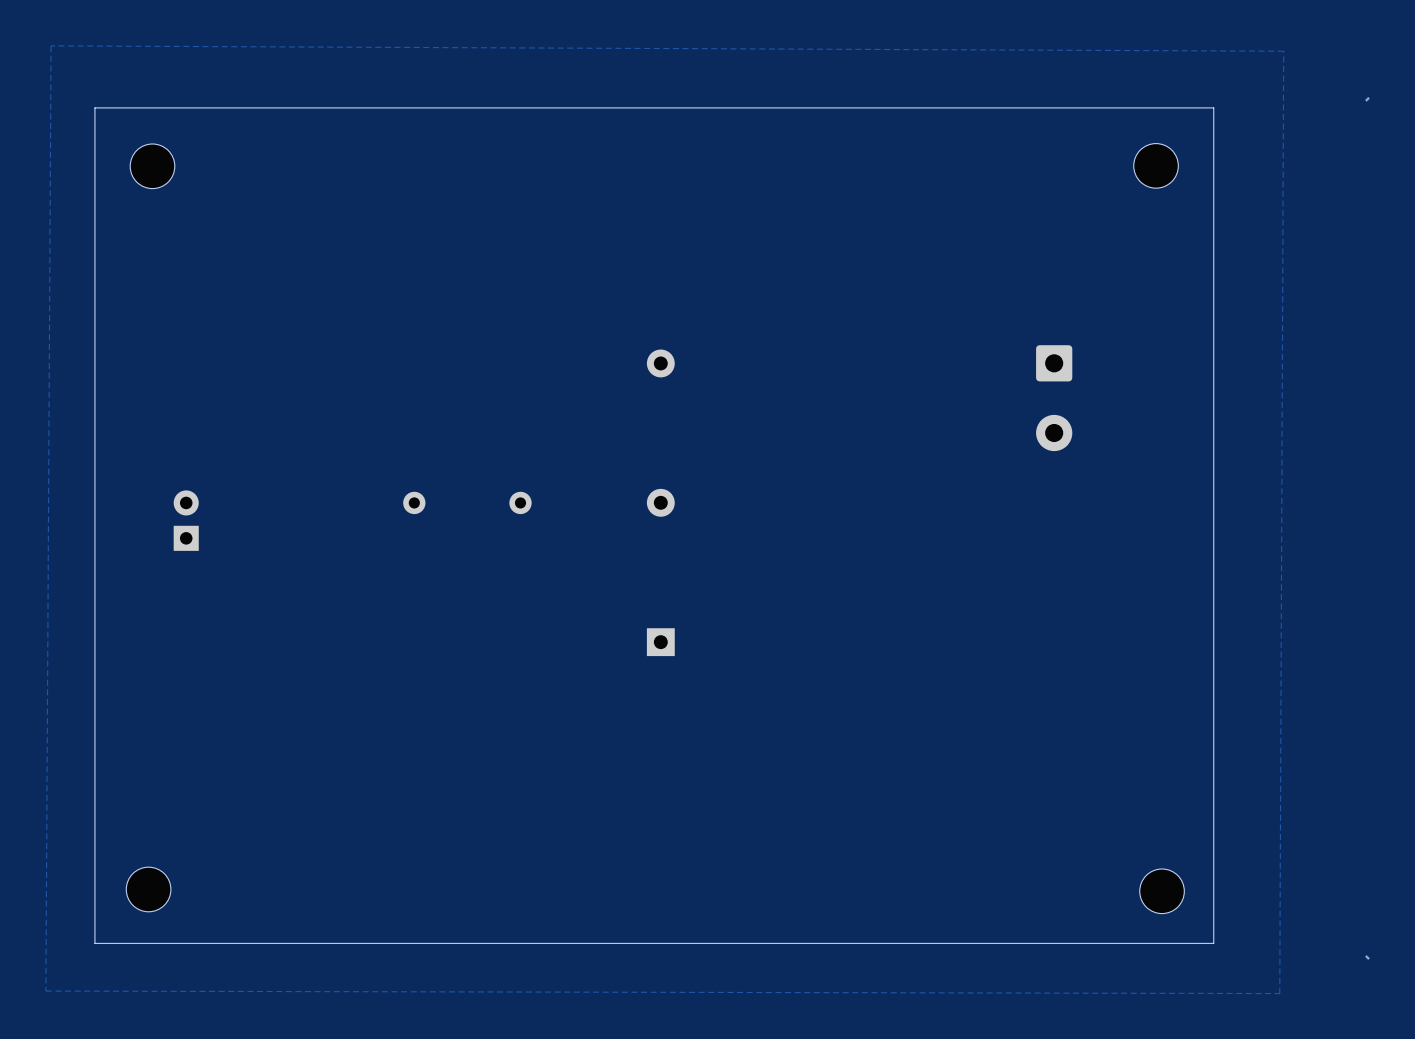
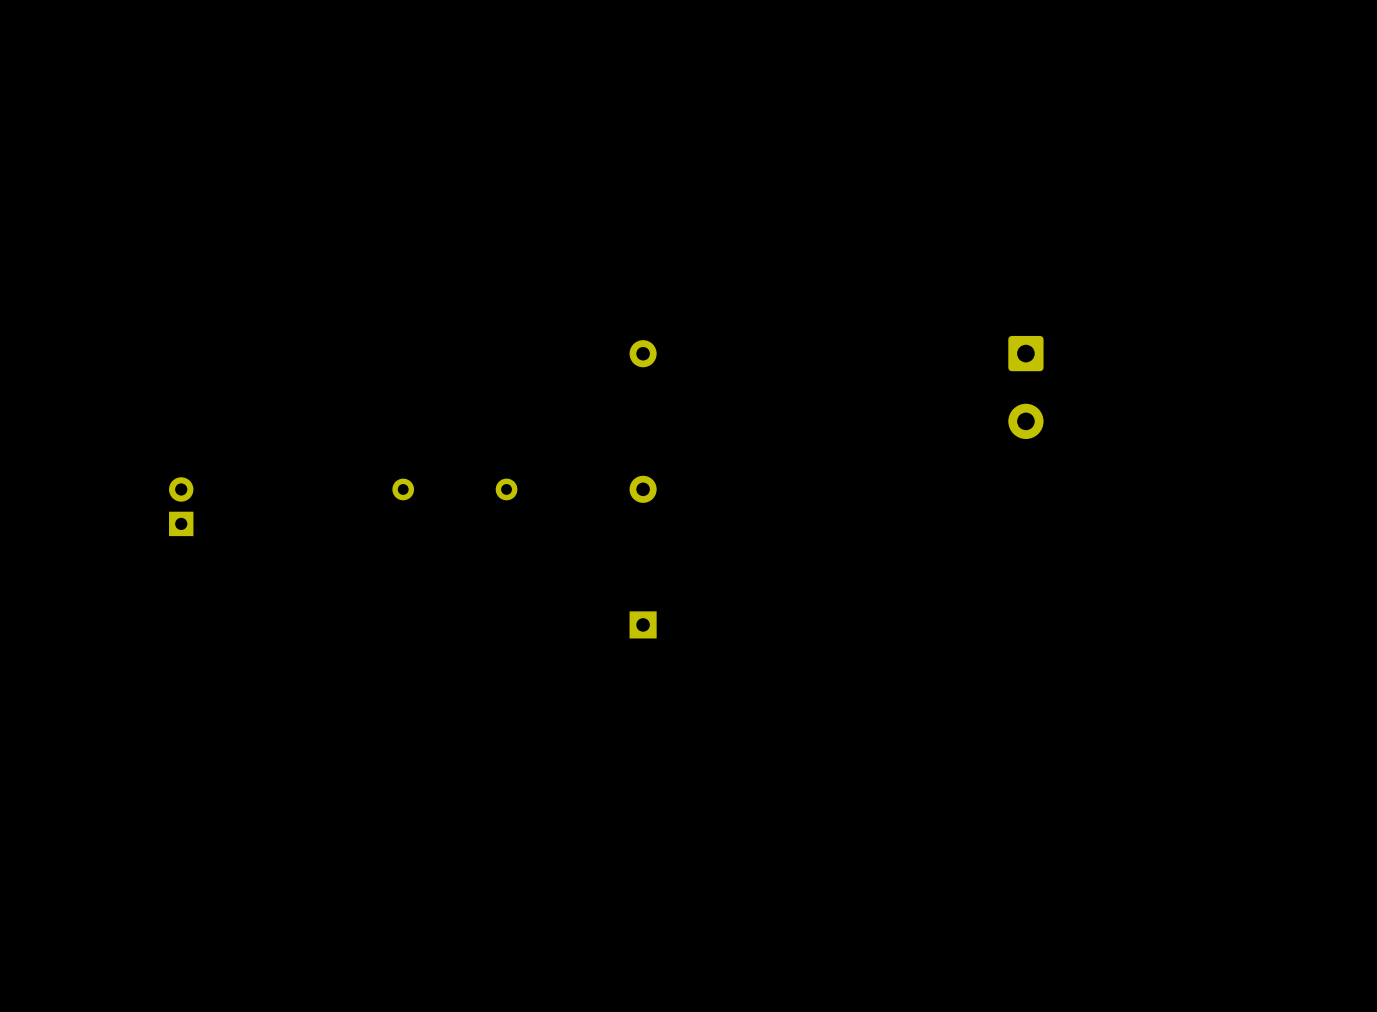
zone outline: (51, 45) (1283, 51) (1279, 993) (45, 991) (51, 45) -> none
board edge: (1367, 97) (1368, 98) -> none
board edge: (1366, 98) (1367, 100) -> none
board edge: (1365, 100) (1366, 101) -> none
board edge: (1213, 107) (94, 107) (94, 943) (1213, 943) (1213, 107) -> none
part: (1156, 165) -> none
part: (152, 166) -> none
part: (148, 889) -> none
part: (1162, 891) -> none
board edge: (1366, 955) (1365, 956) -> none
board edge: (1367, 956) (1366, 957) -> none
board edge: (1368, 957) (1367, 959) -> none

